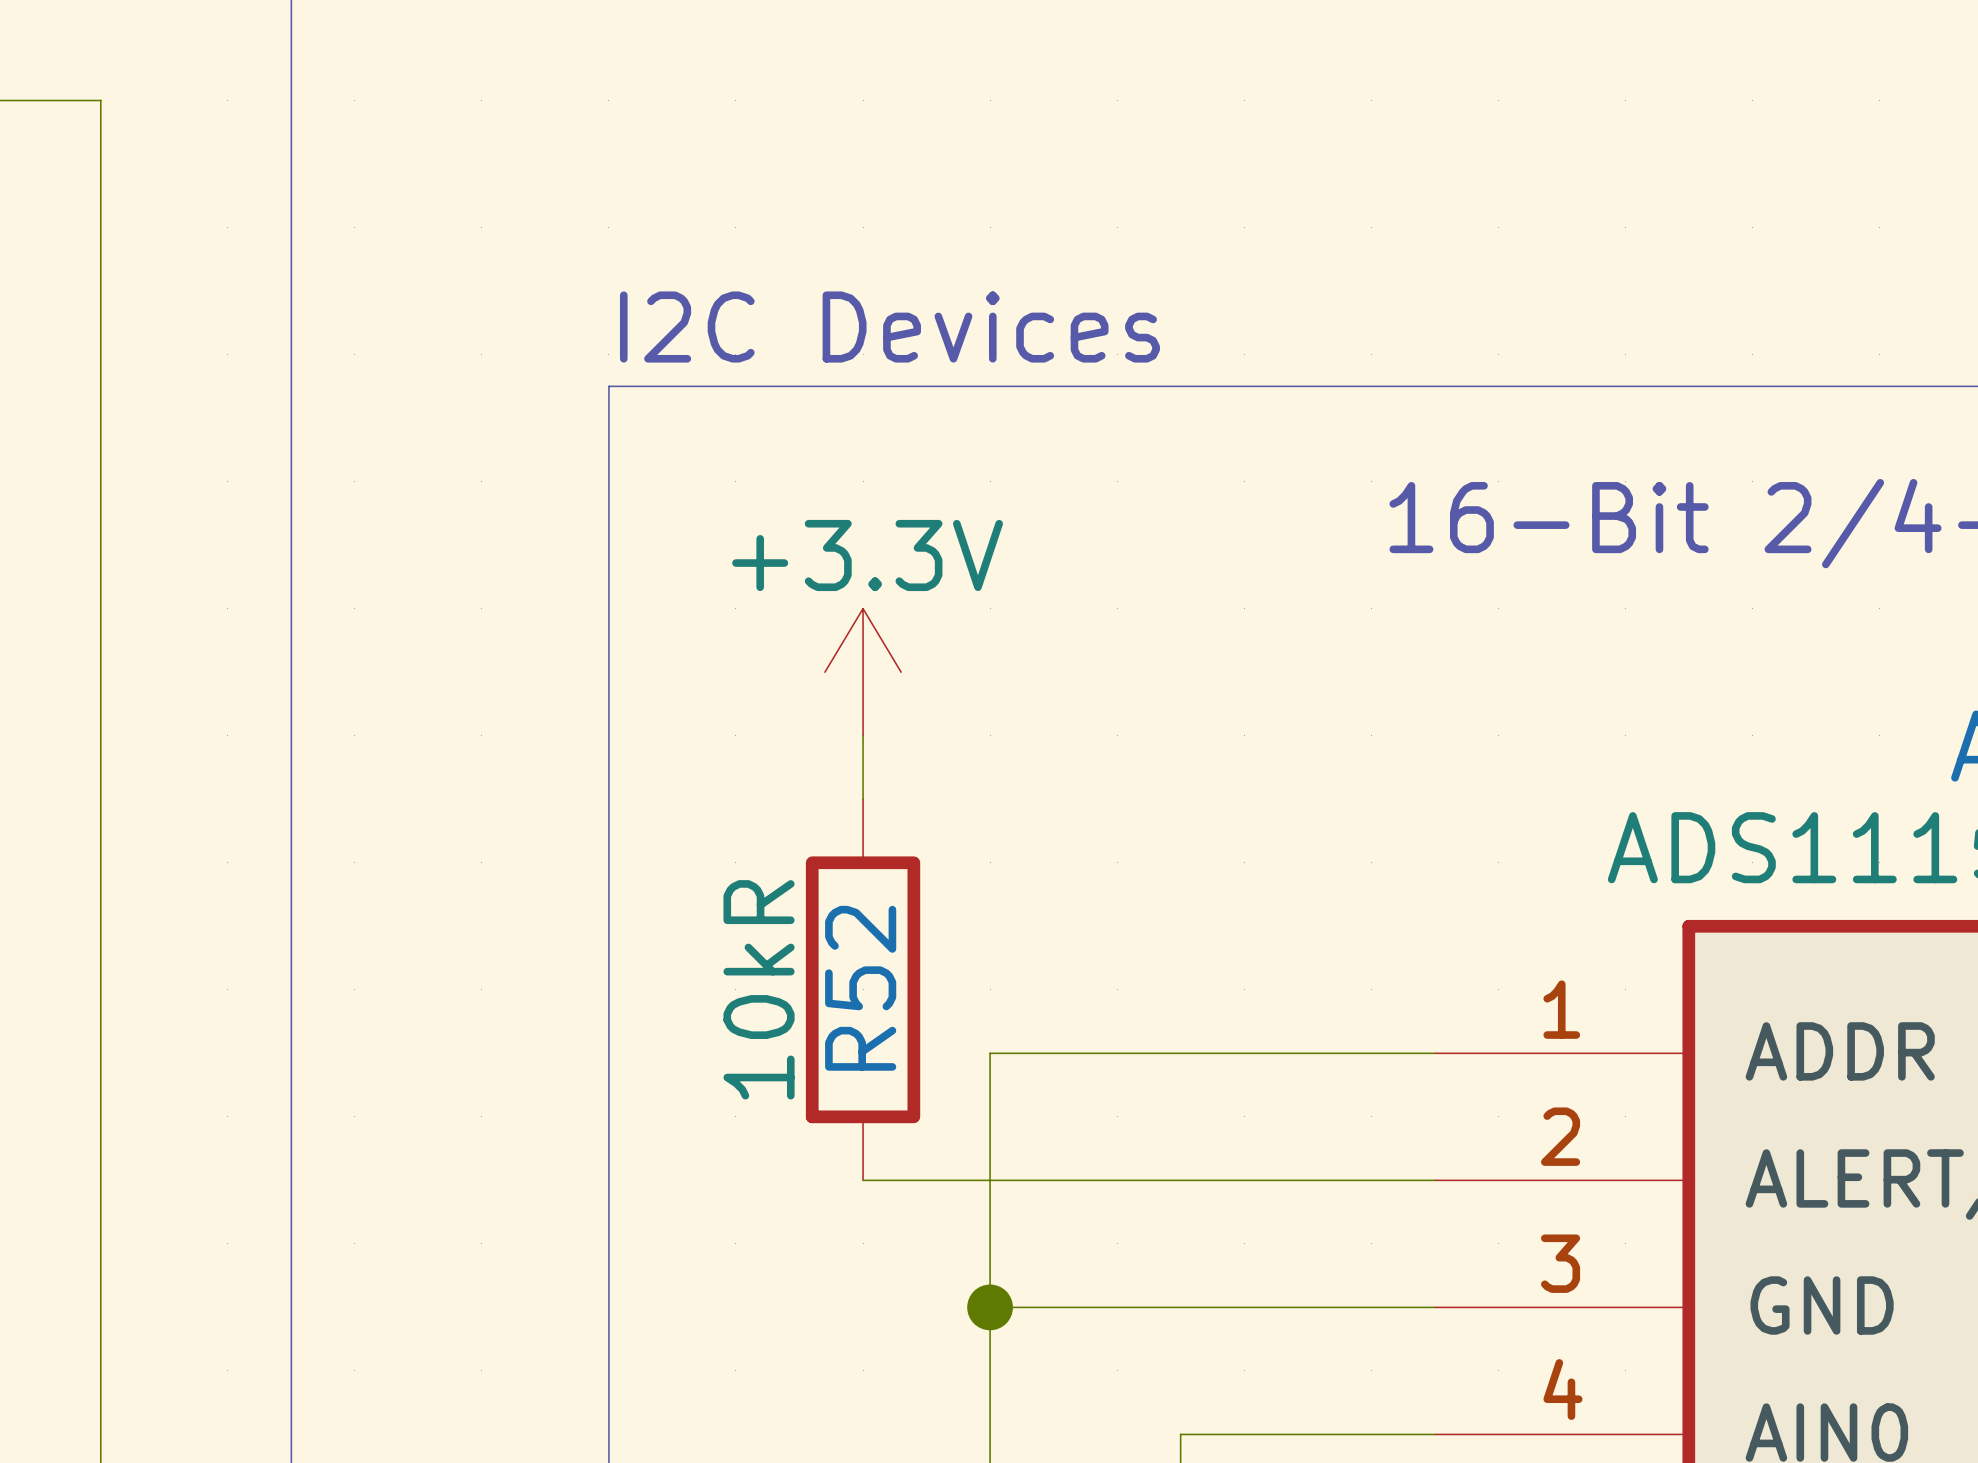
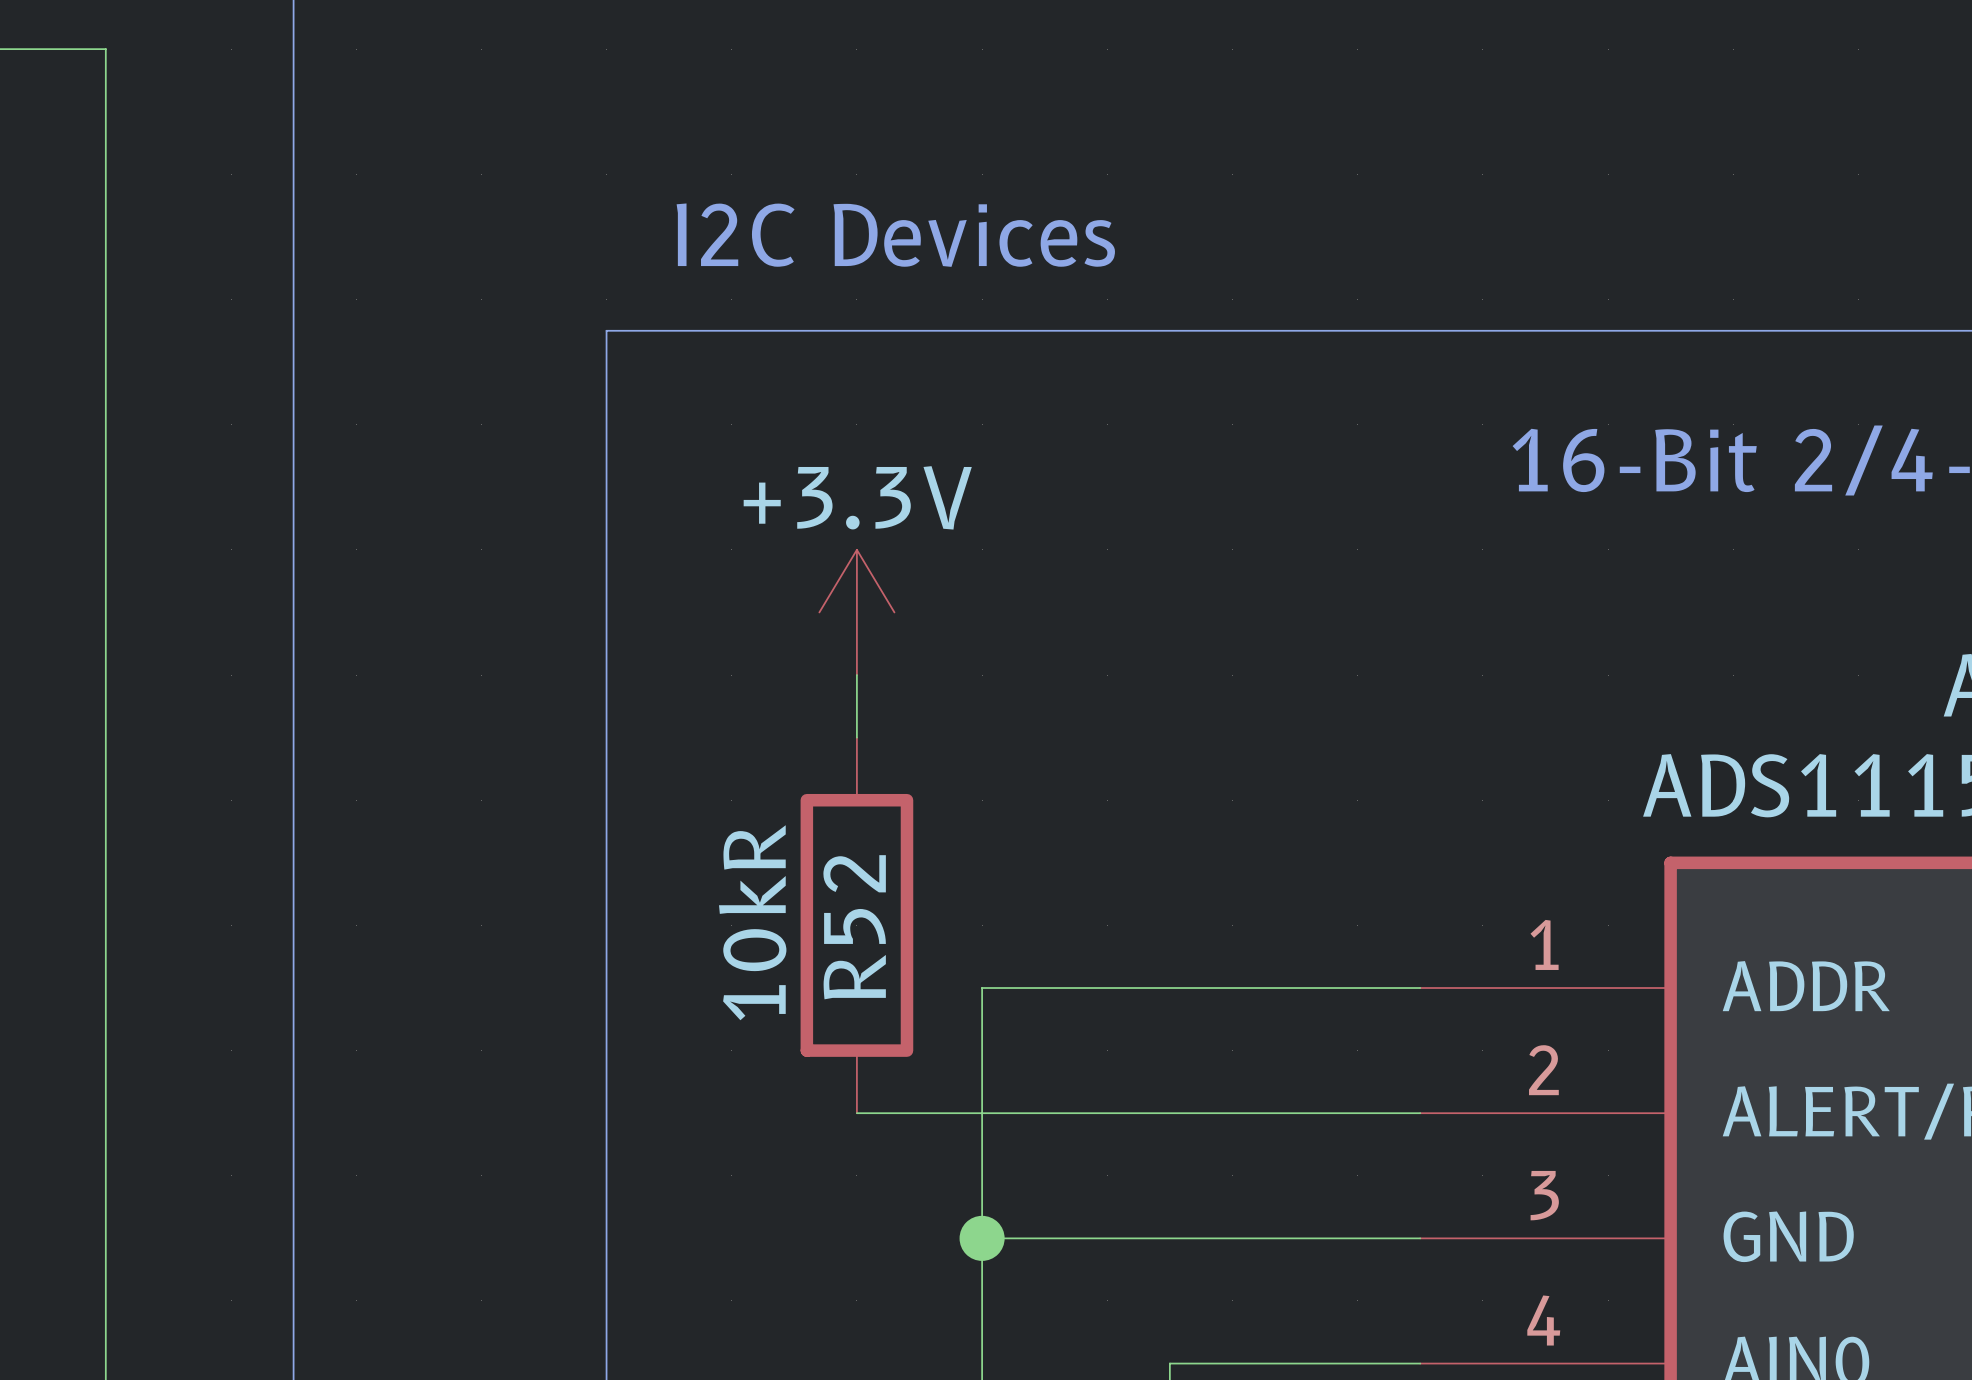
text position: I2C Devices (889, 327) -> I2C Devices (895, 235)

